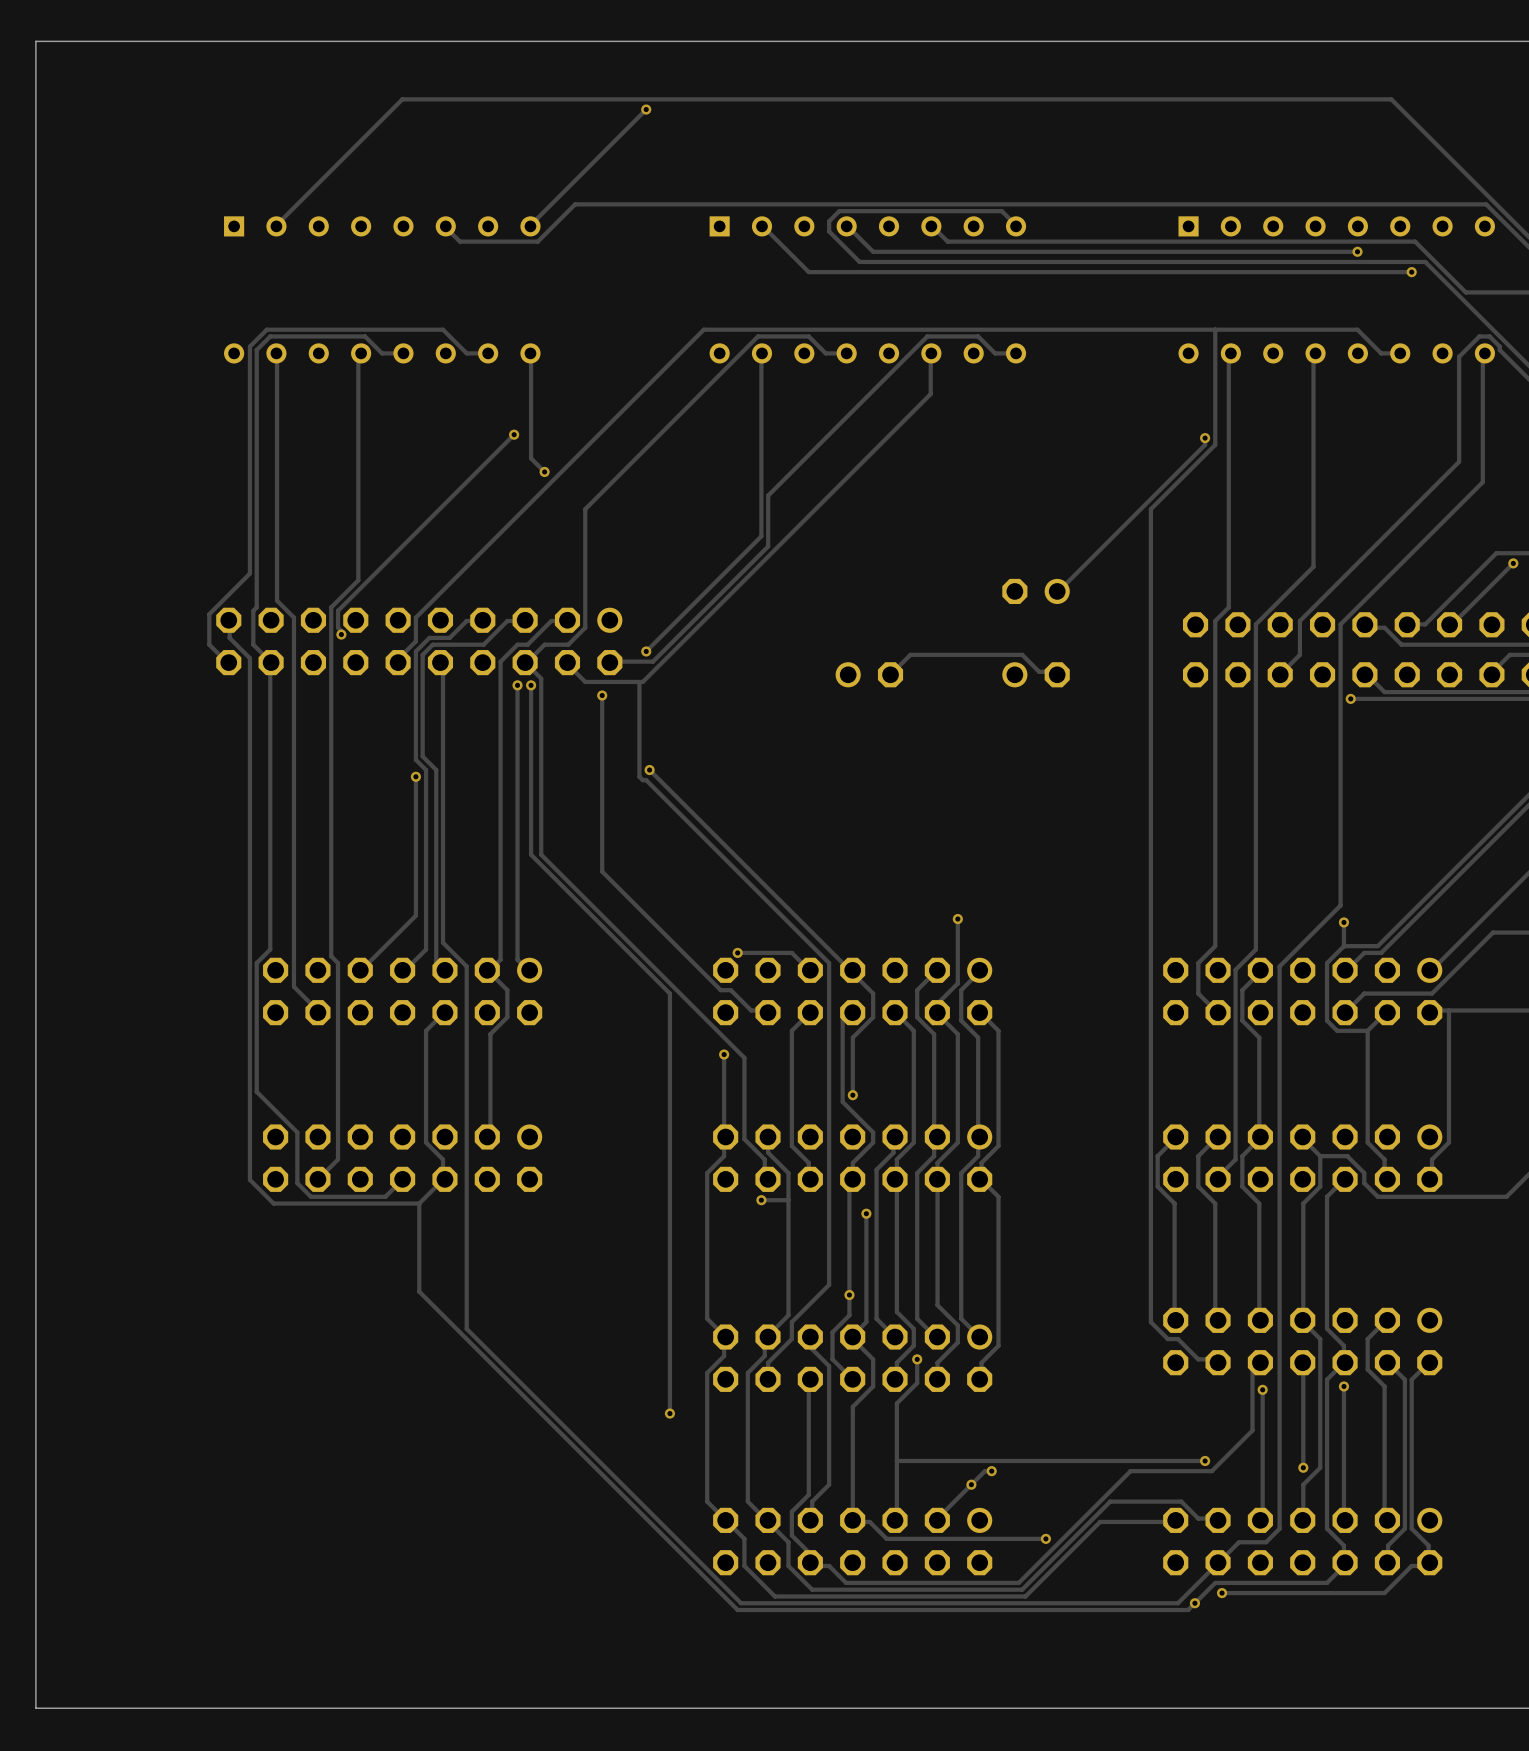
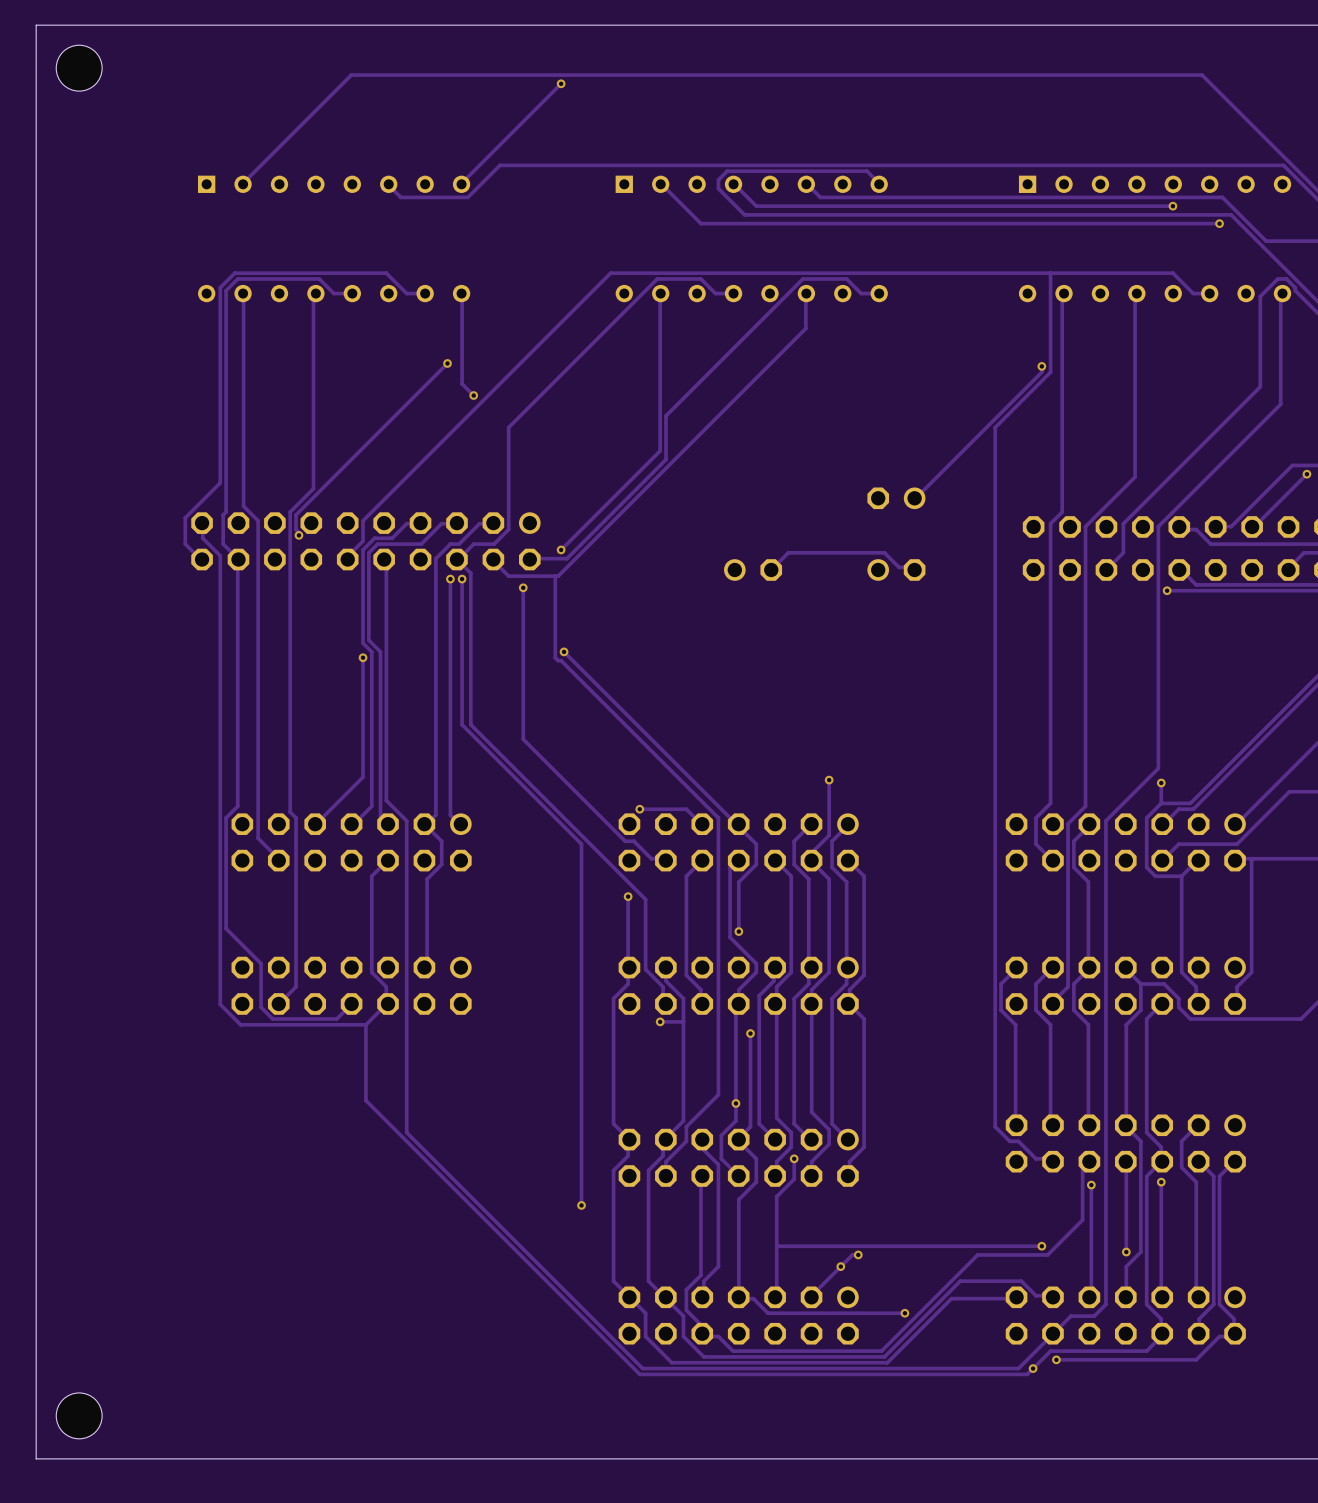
hole: none -> (79, 68)
hole: none -> (79, 1415)

